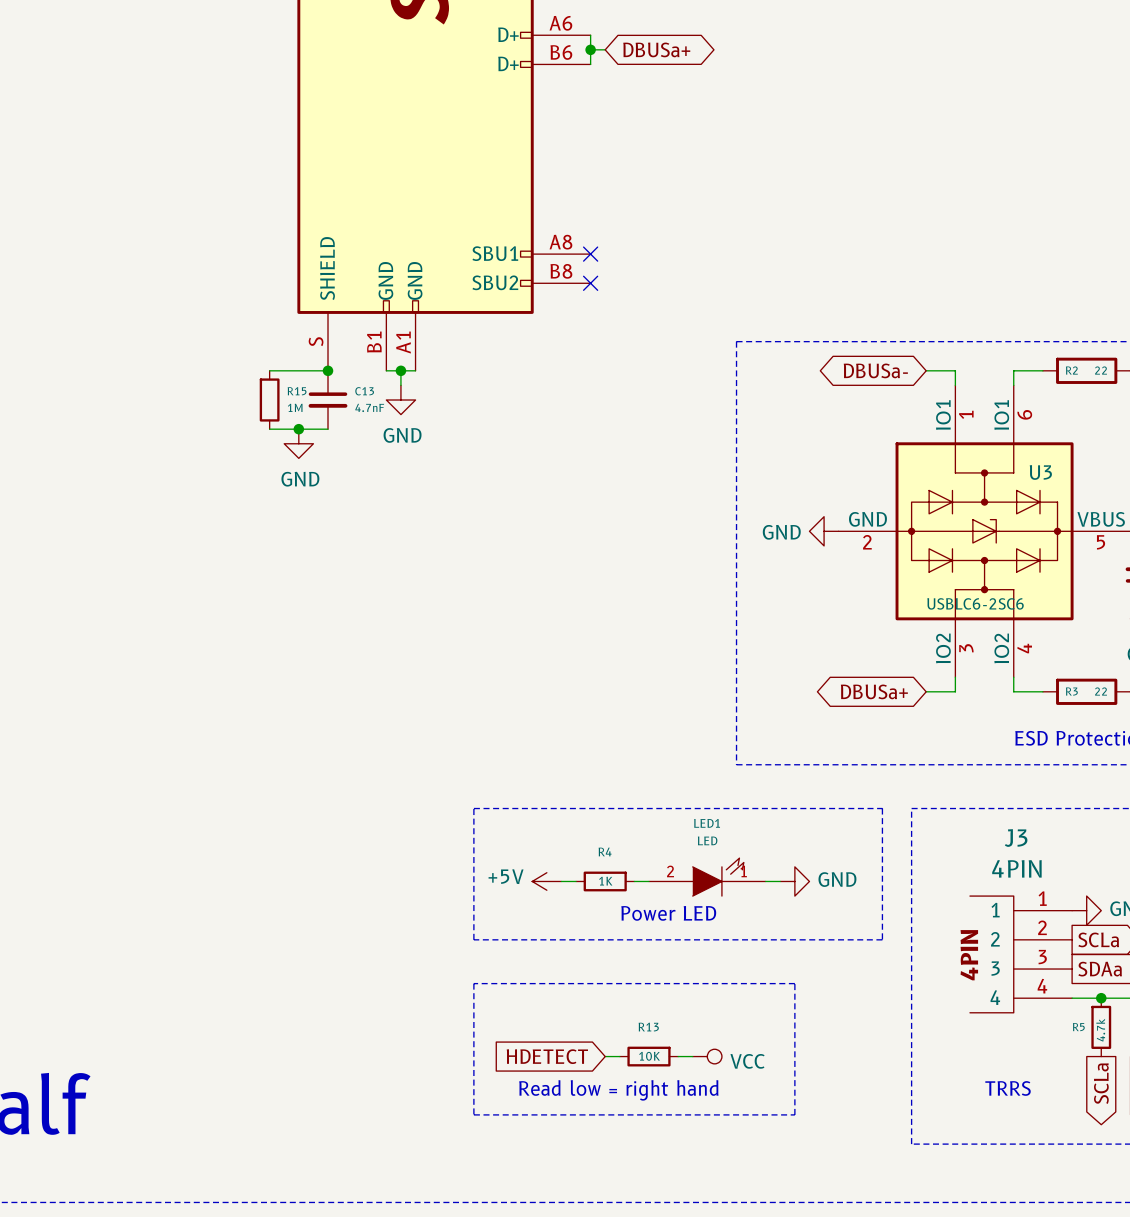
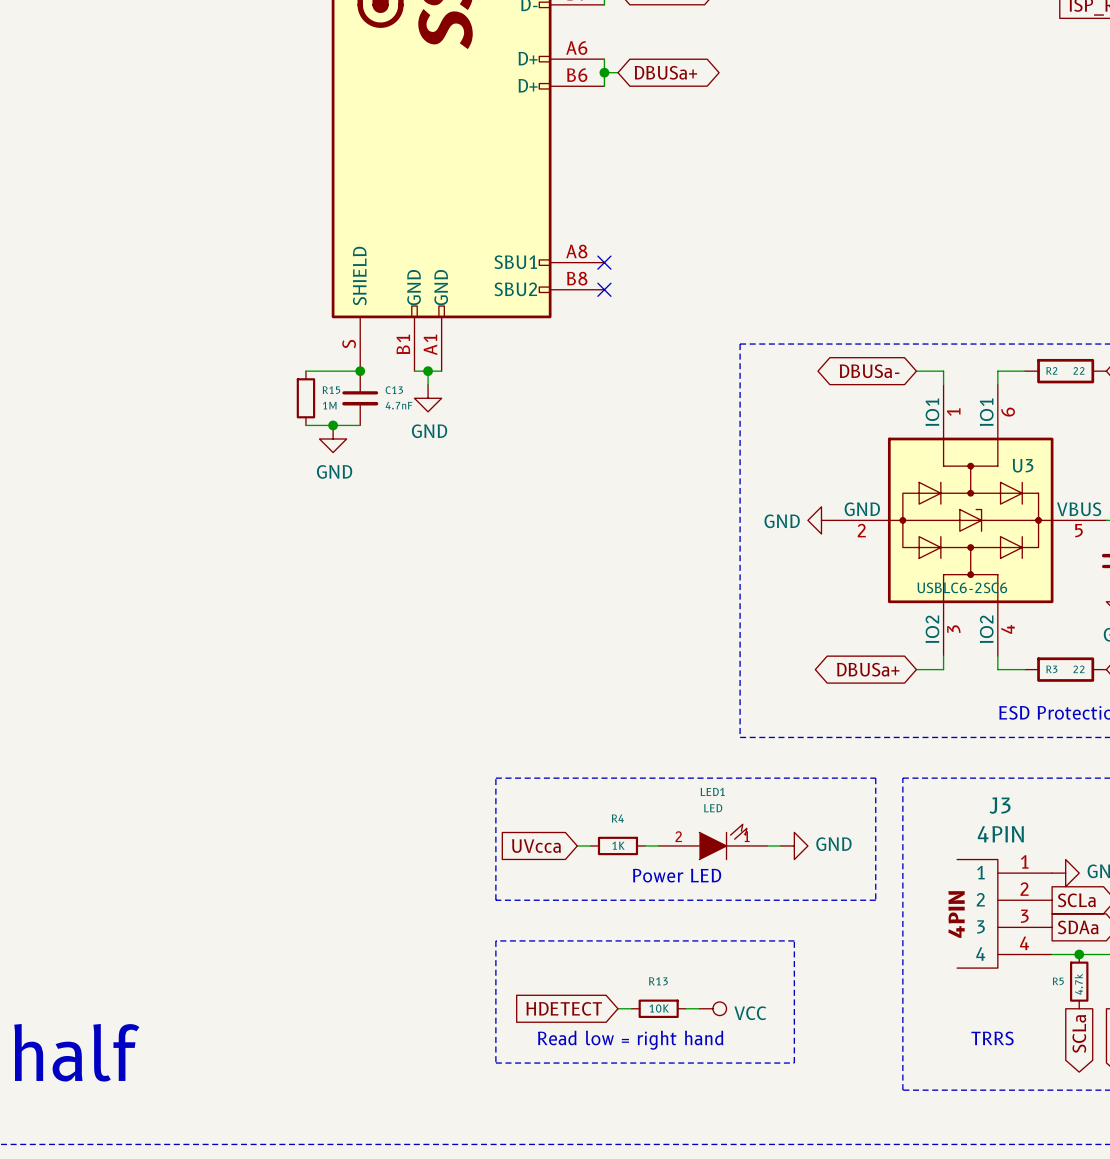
global label: none -> UVcca (536, 846)
power symbol: +5V (546, 881) -> none

